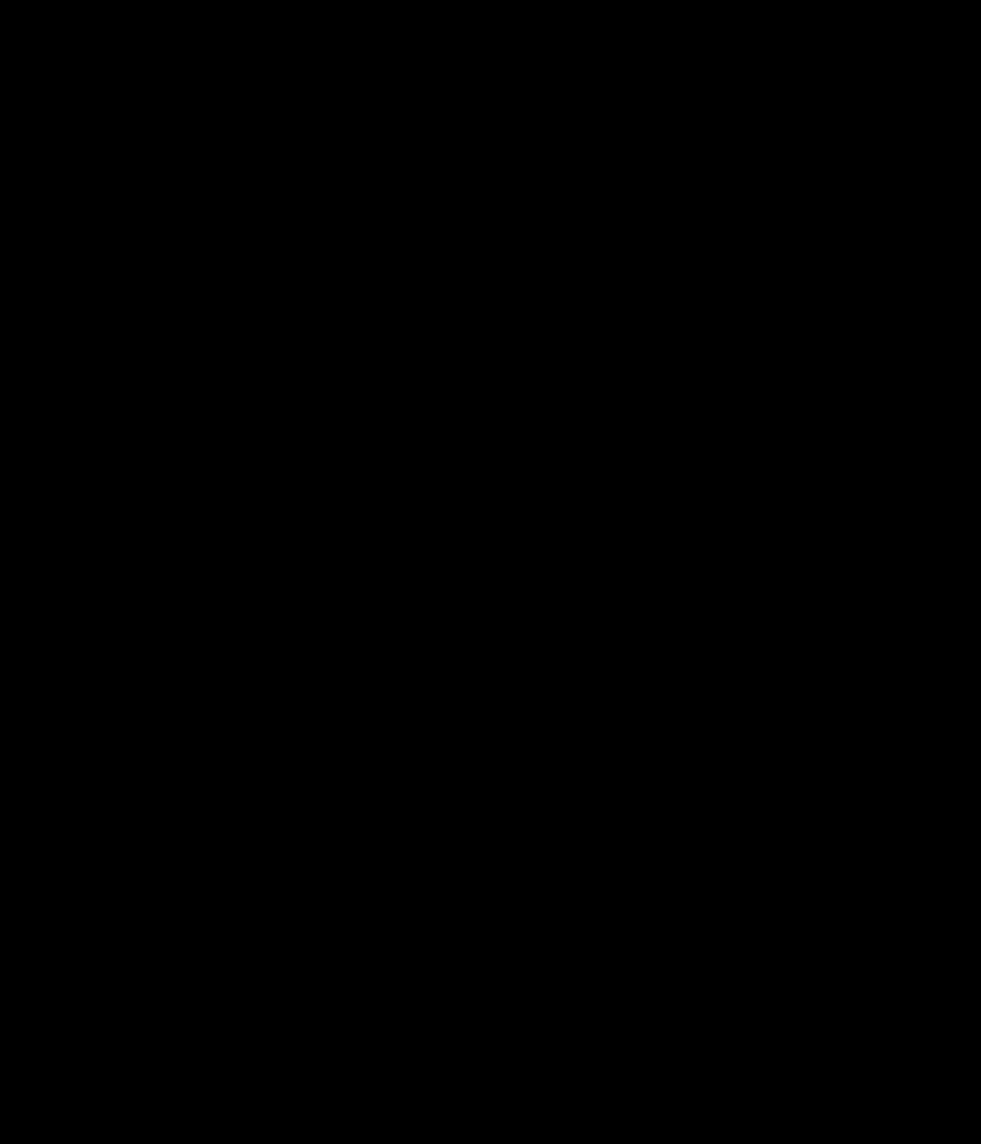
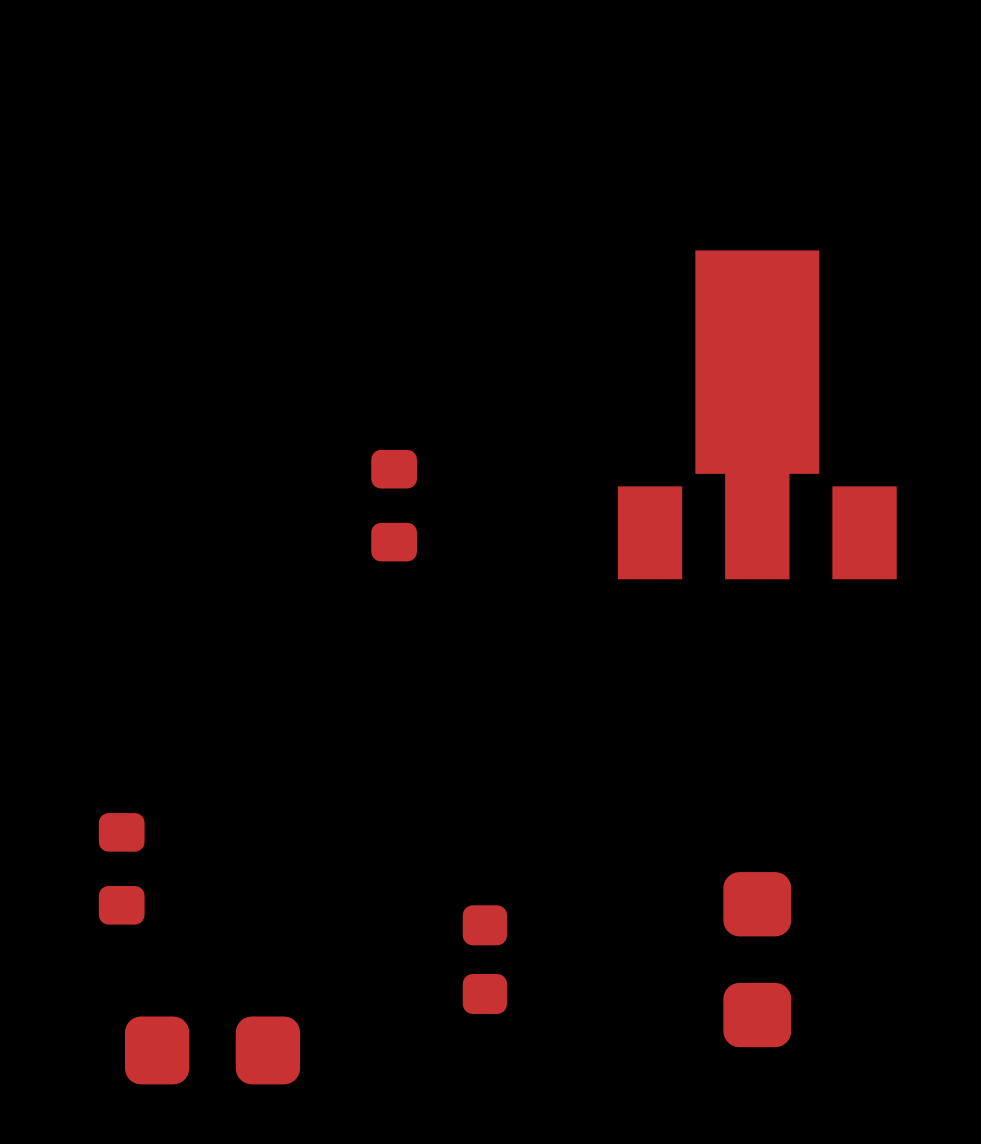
part: none -> (757, 414)
part: none -> (394, 505)
part: none -> (121, 868)
part: none -> (484, 959)
part: none -> (757, 959)
part: none -> (212, 1050)

